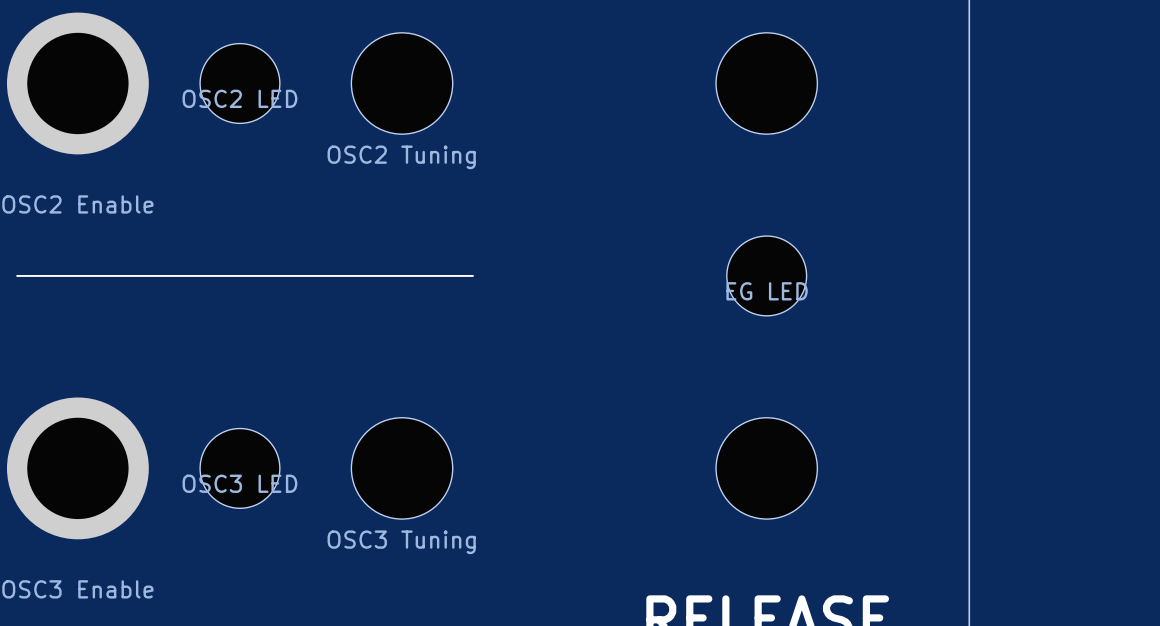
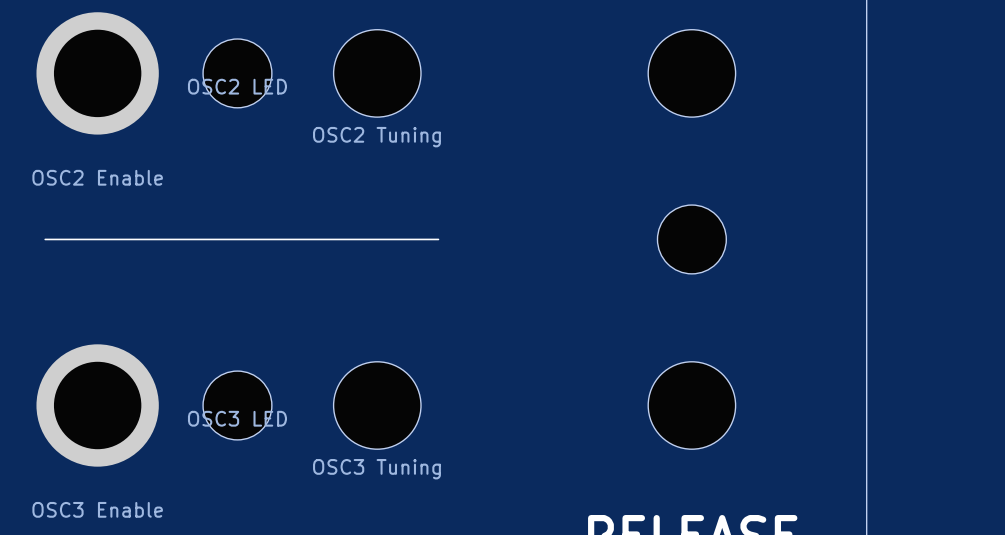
part value: EG LED (767, 291) -> none

